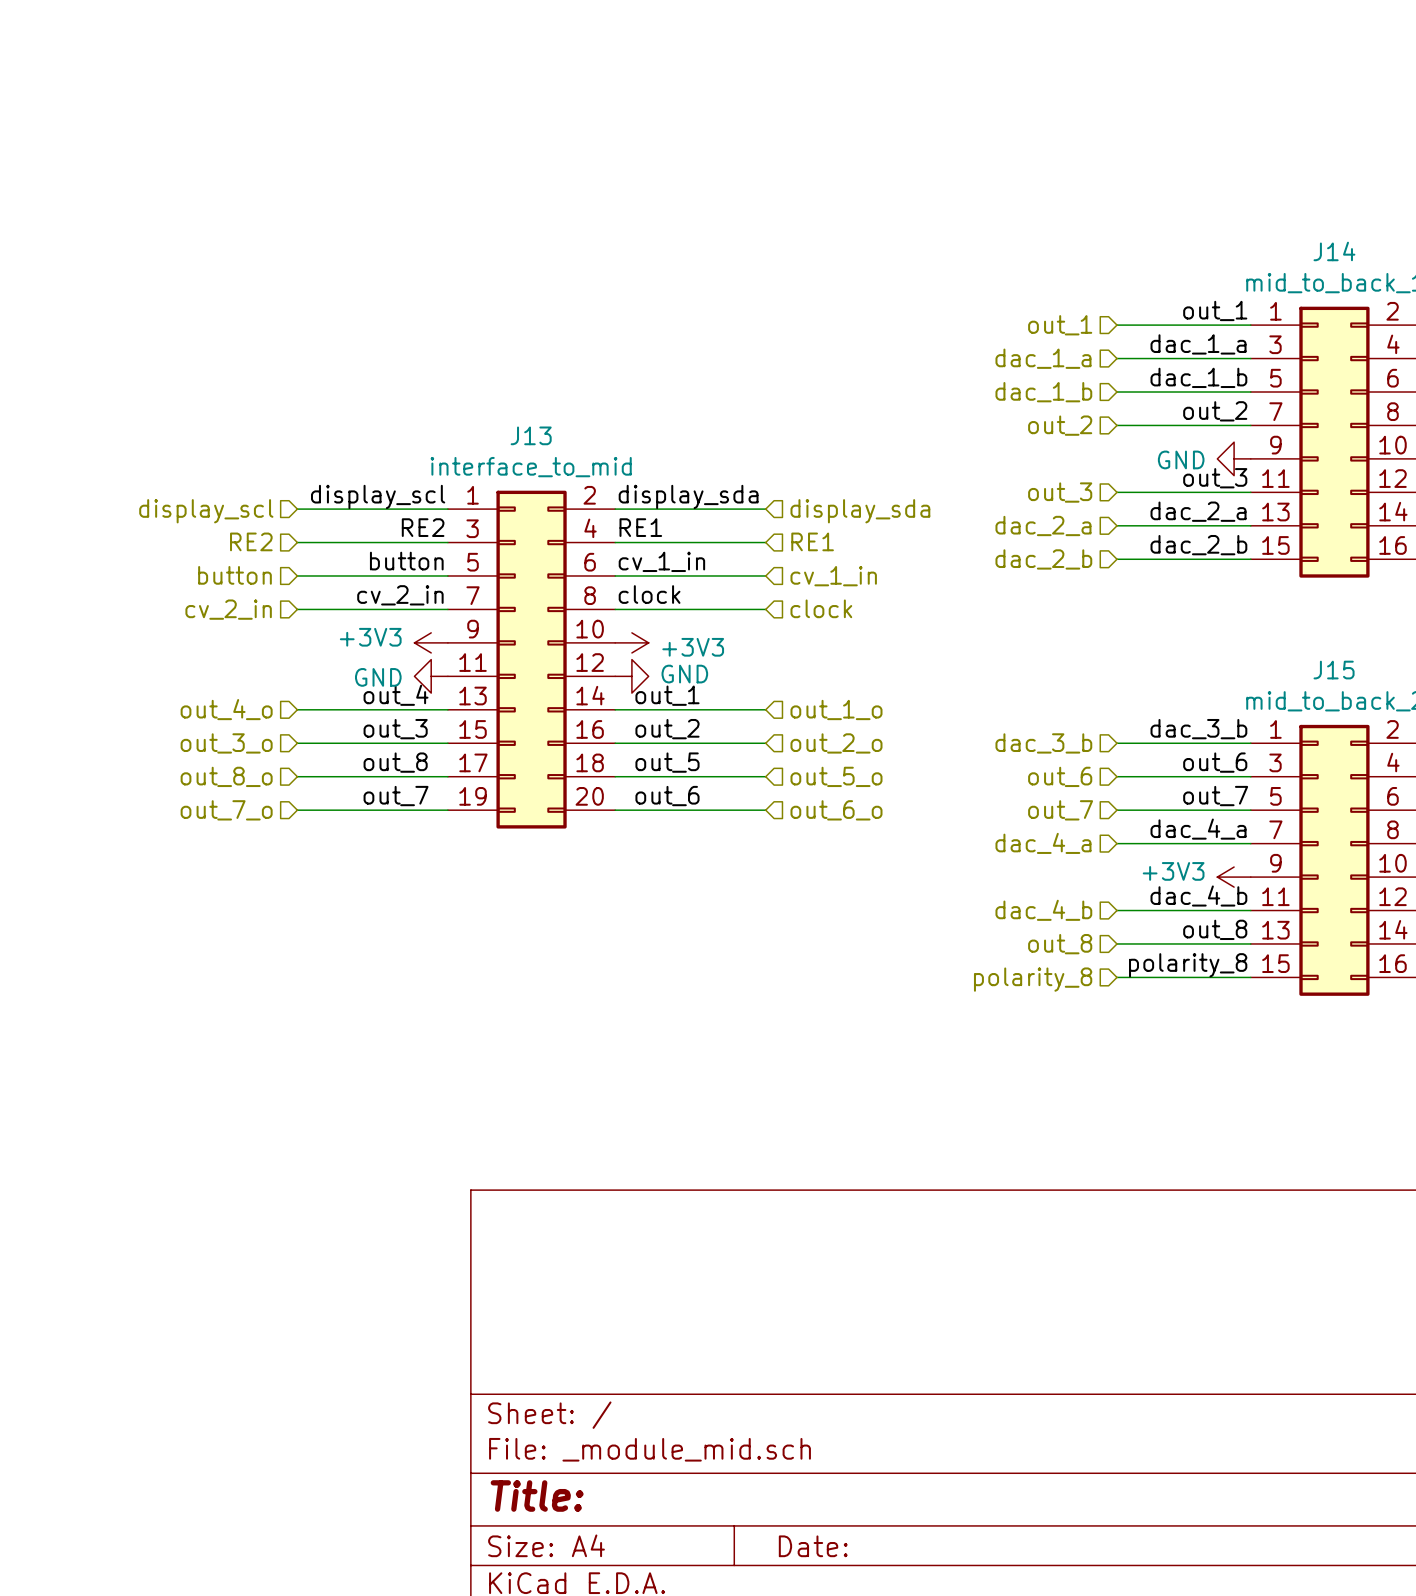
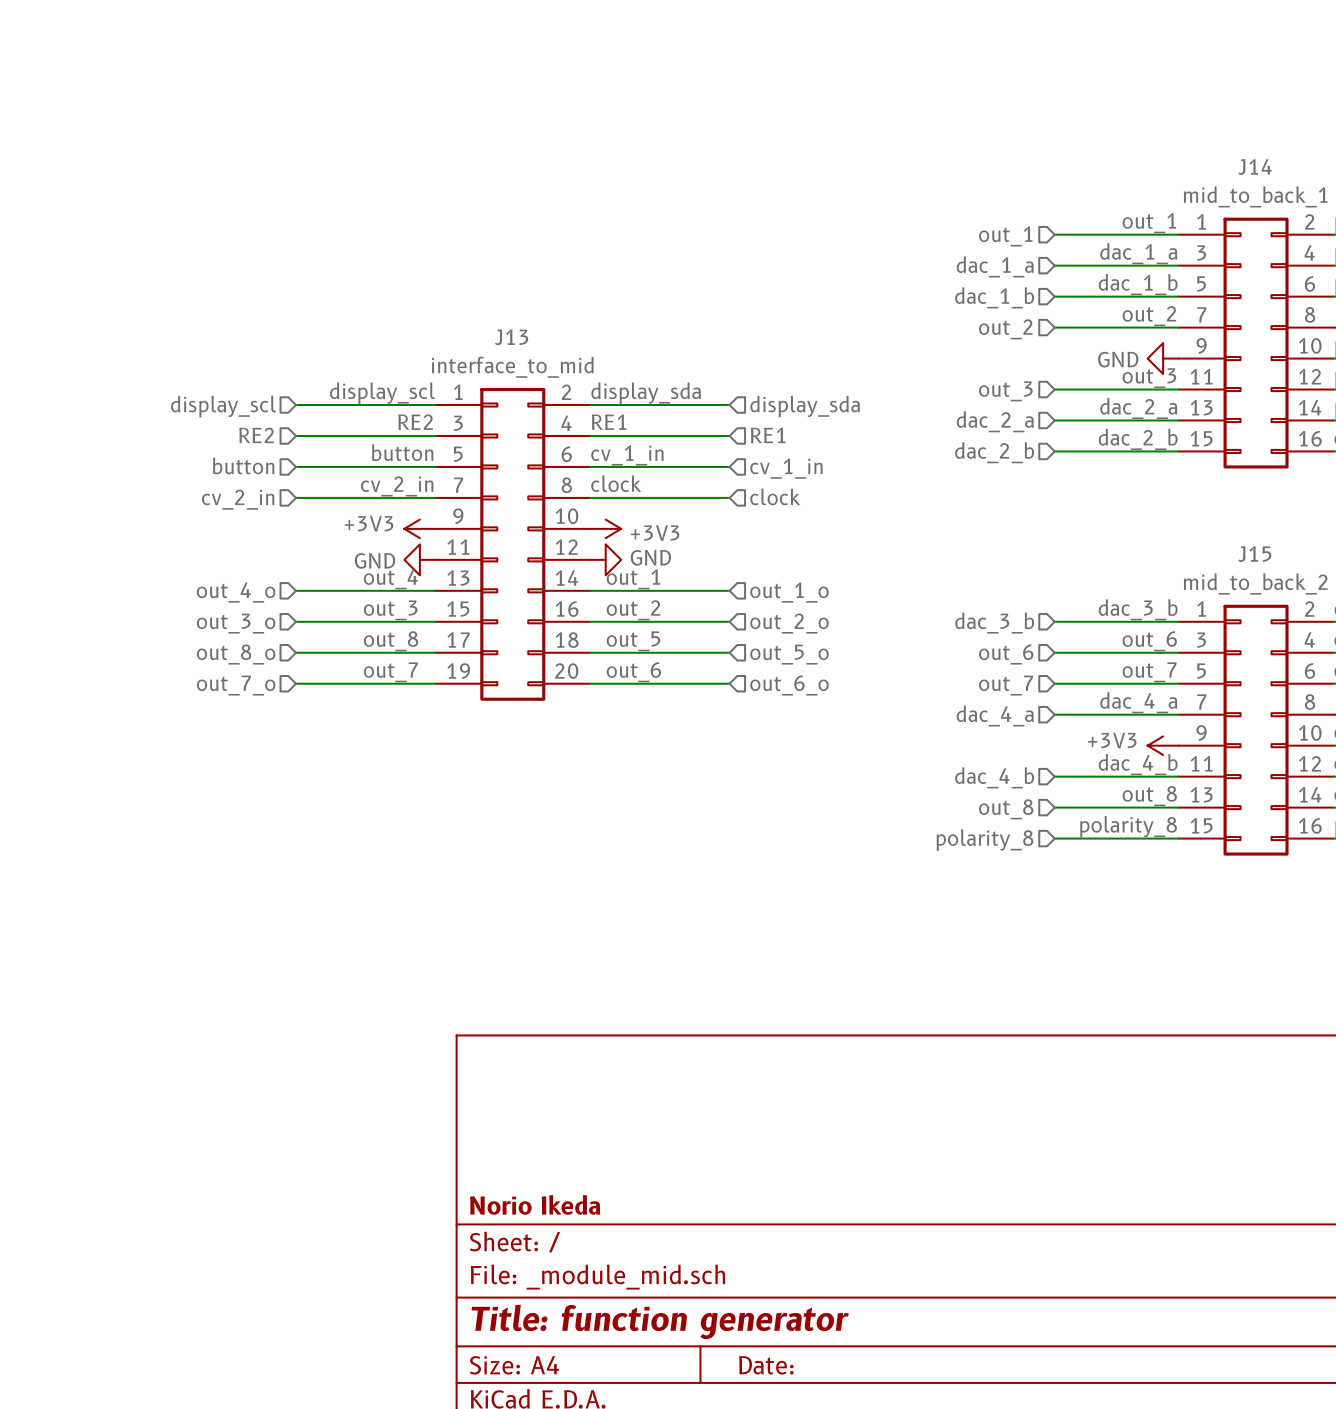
title block: none -> Norio Ikeda (535, 1204)
title block: Title: (537, 1496) -> Title: function generator (660, 1321)

